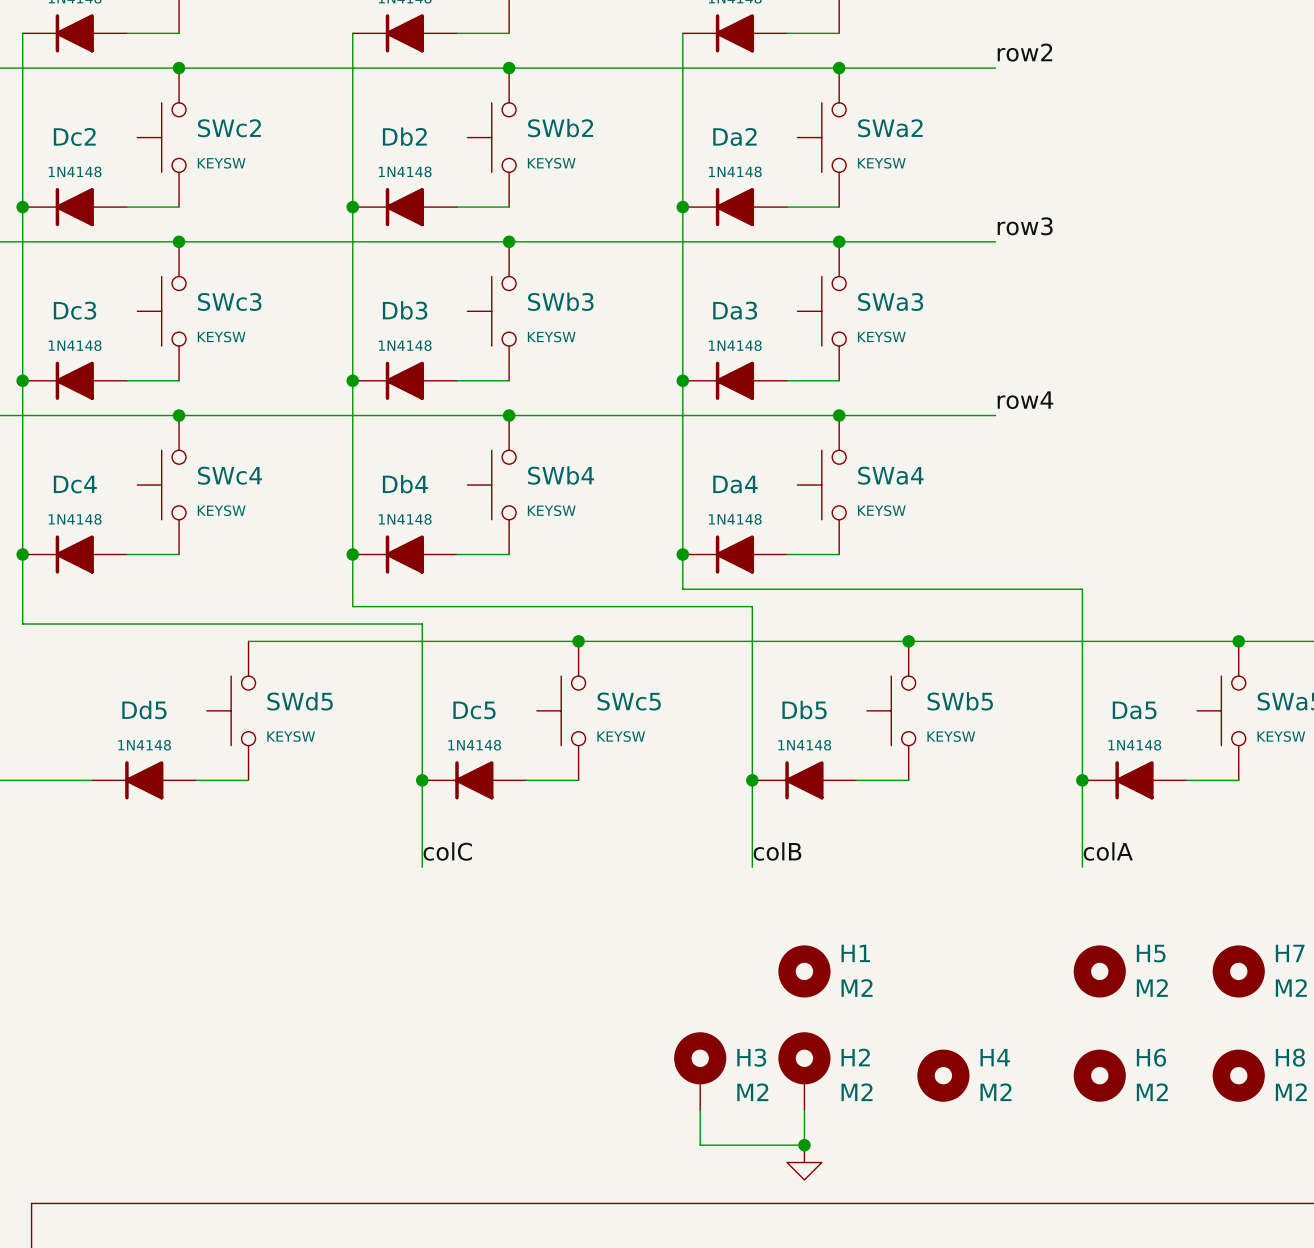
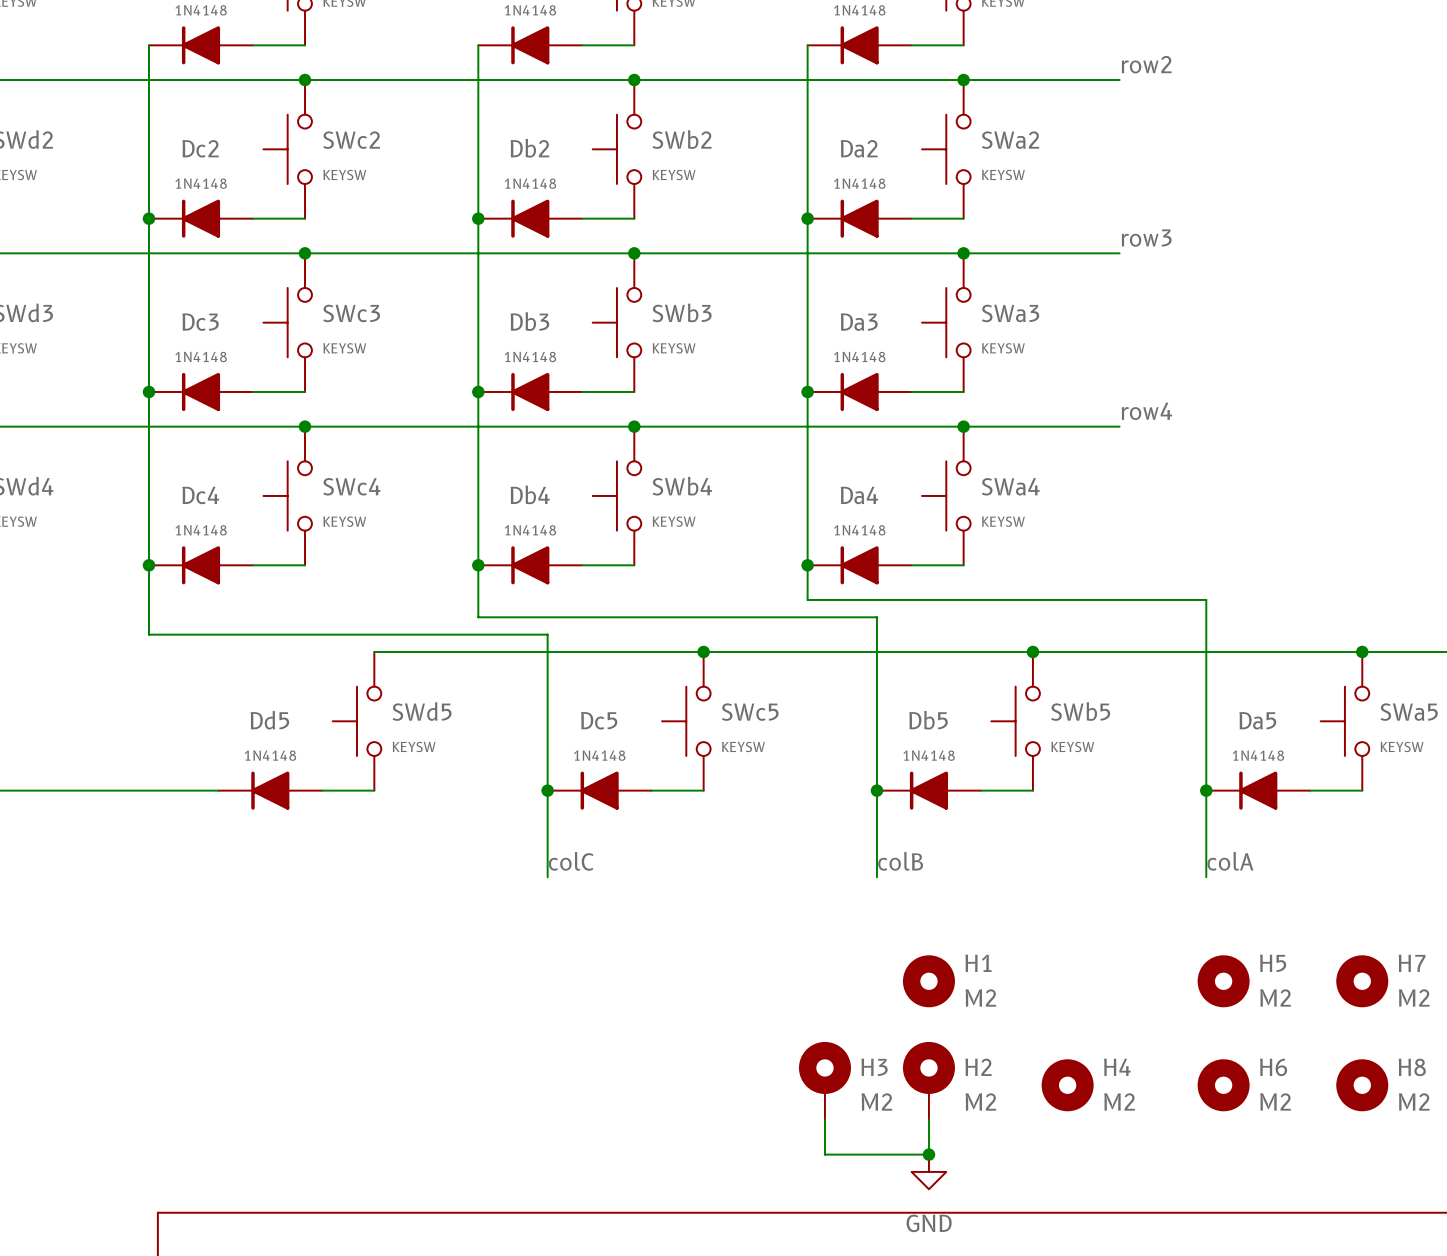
power symbol text: none -> GND (929, 1223)

